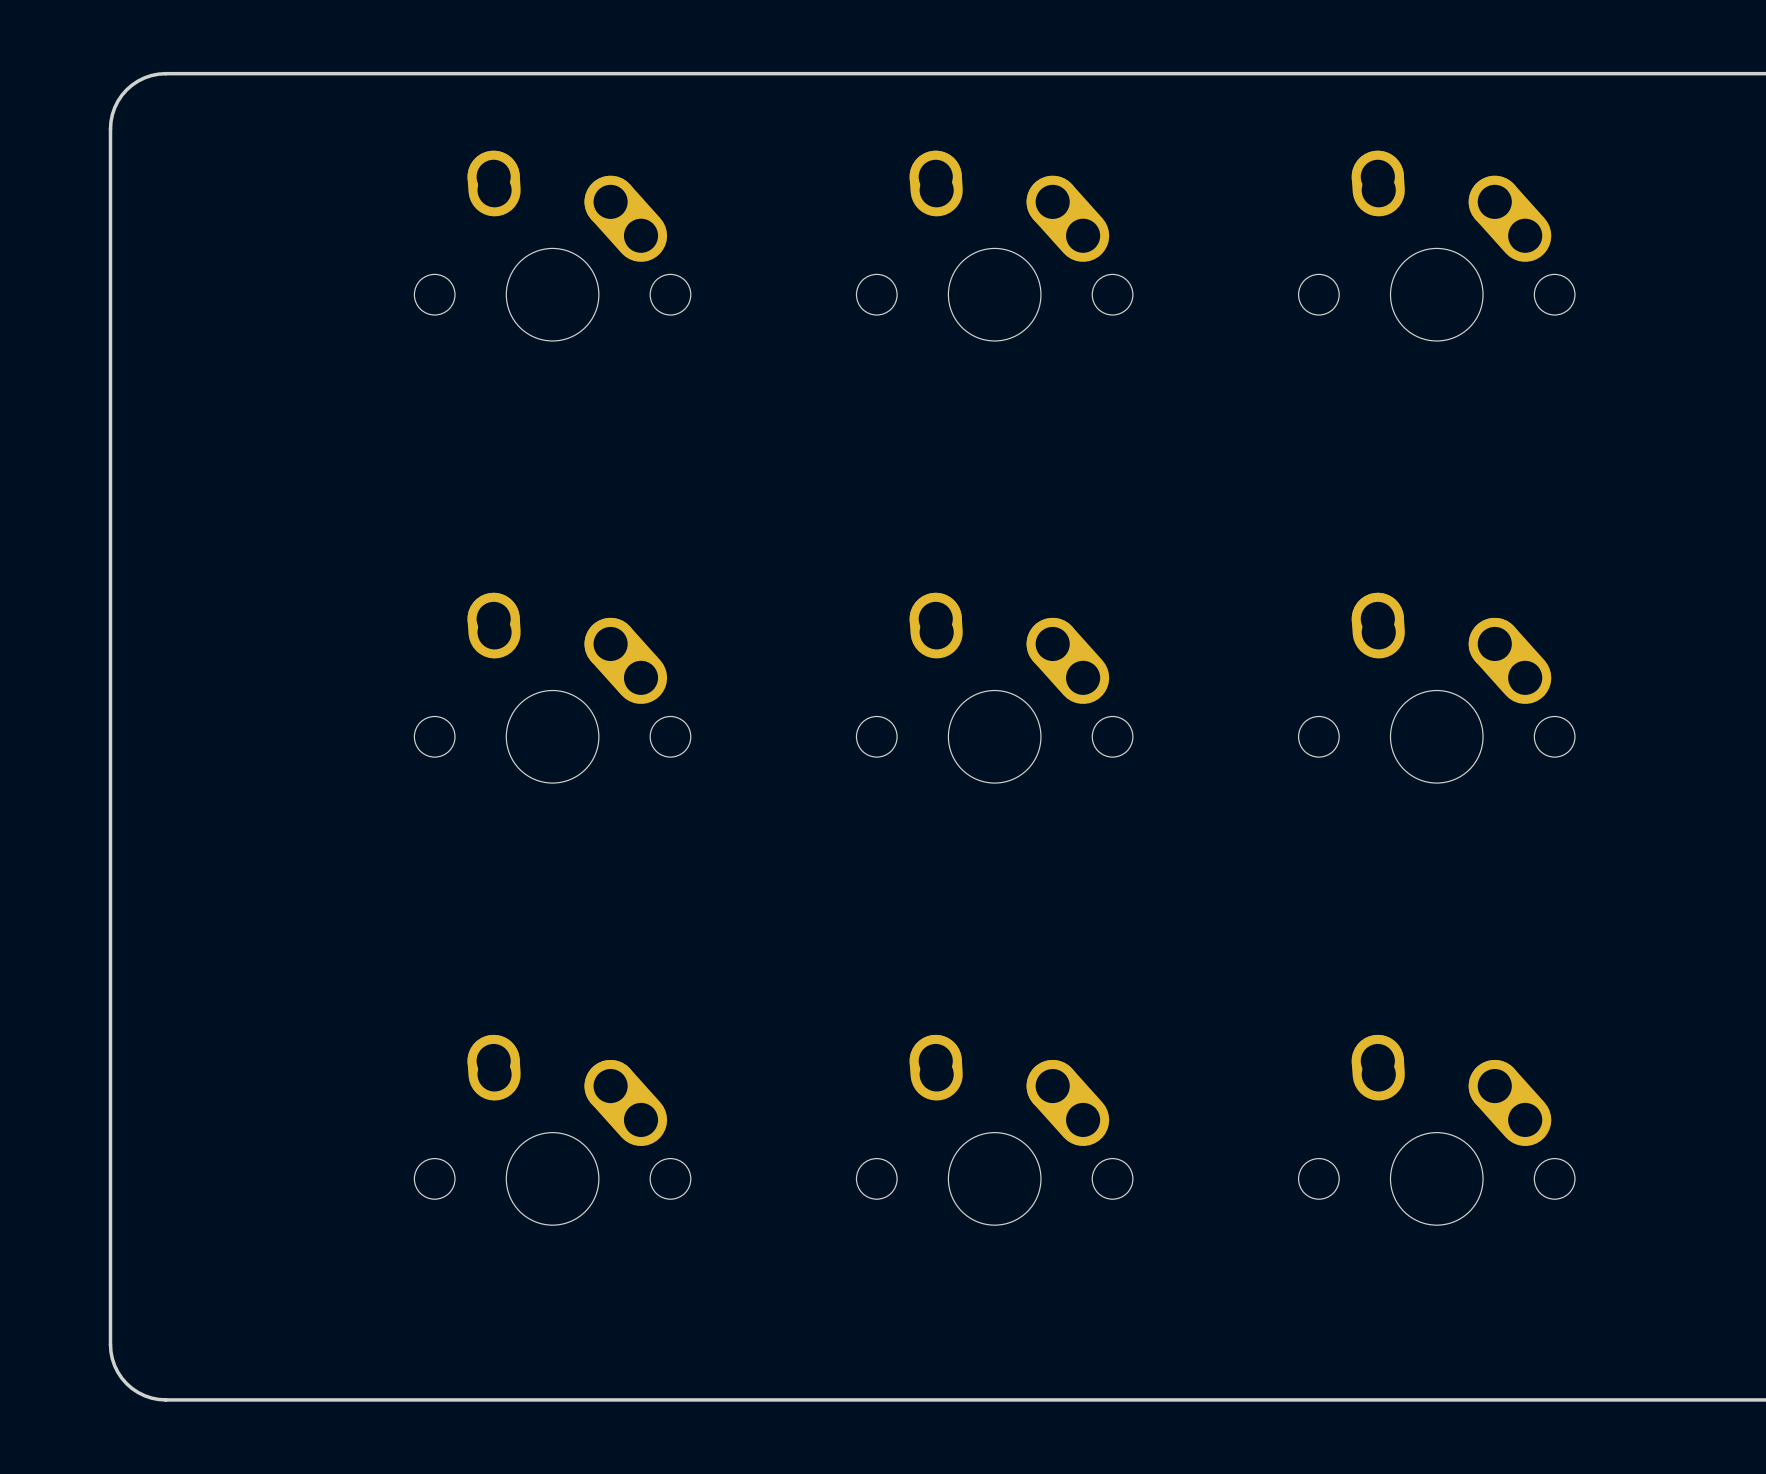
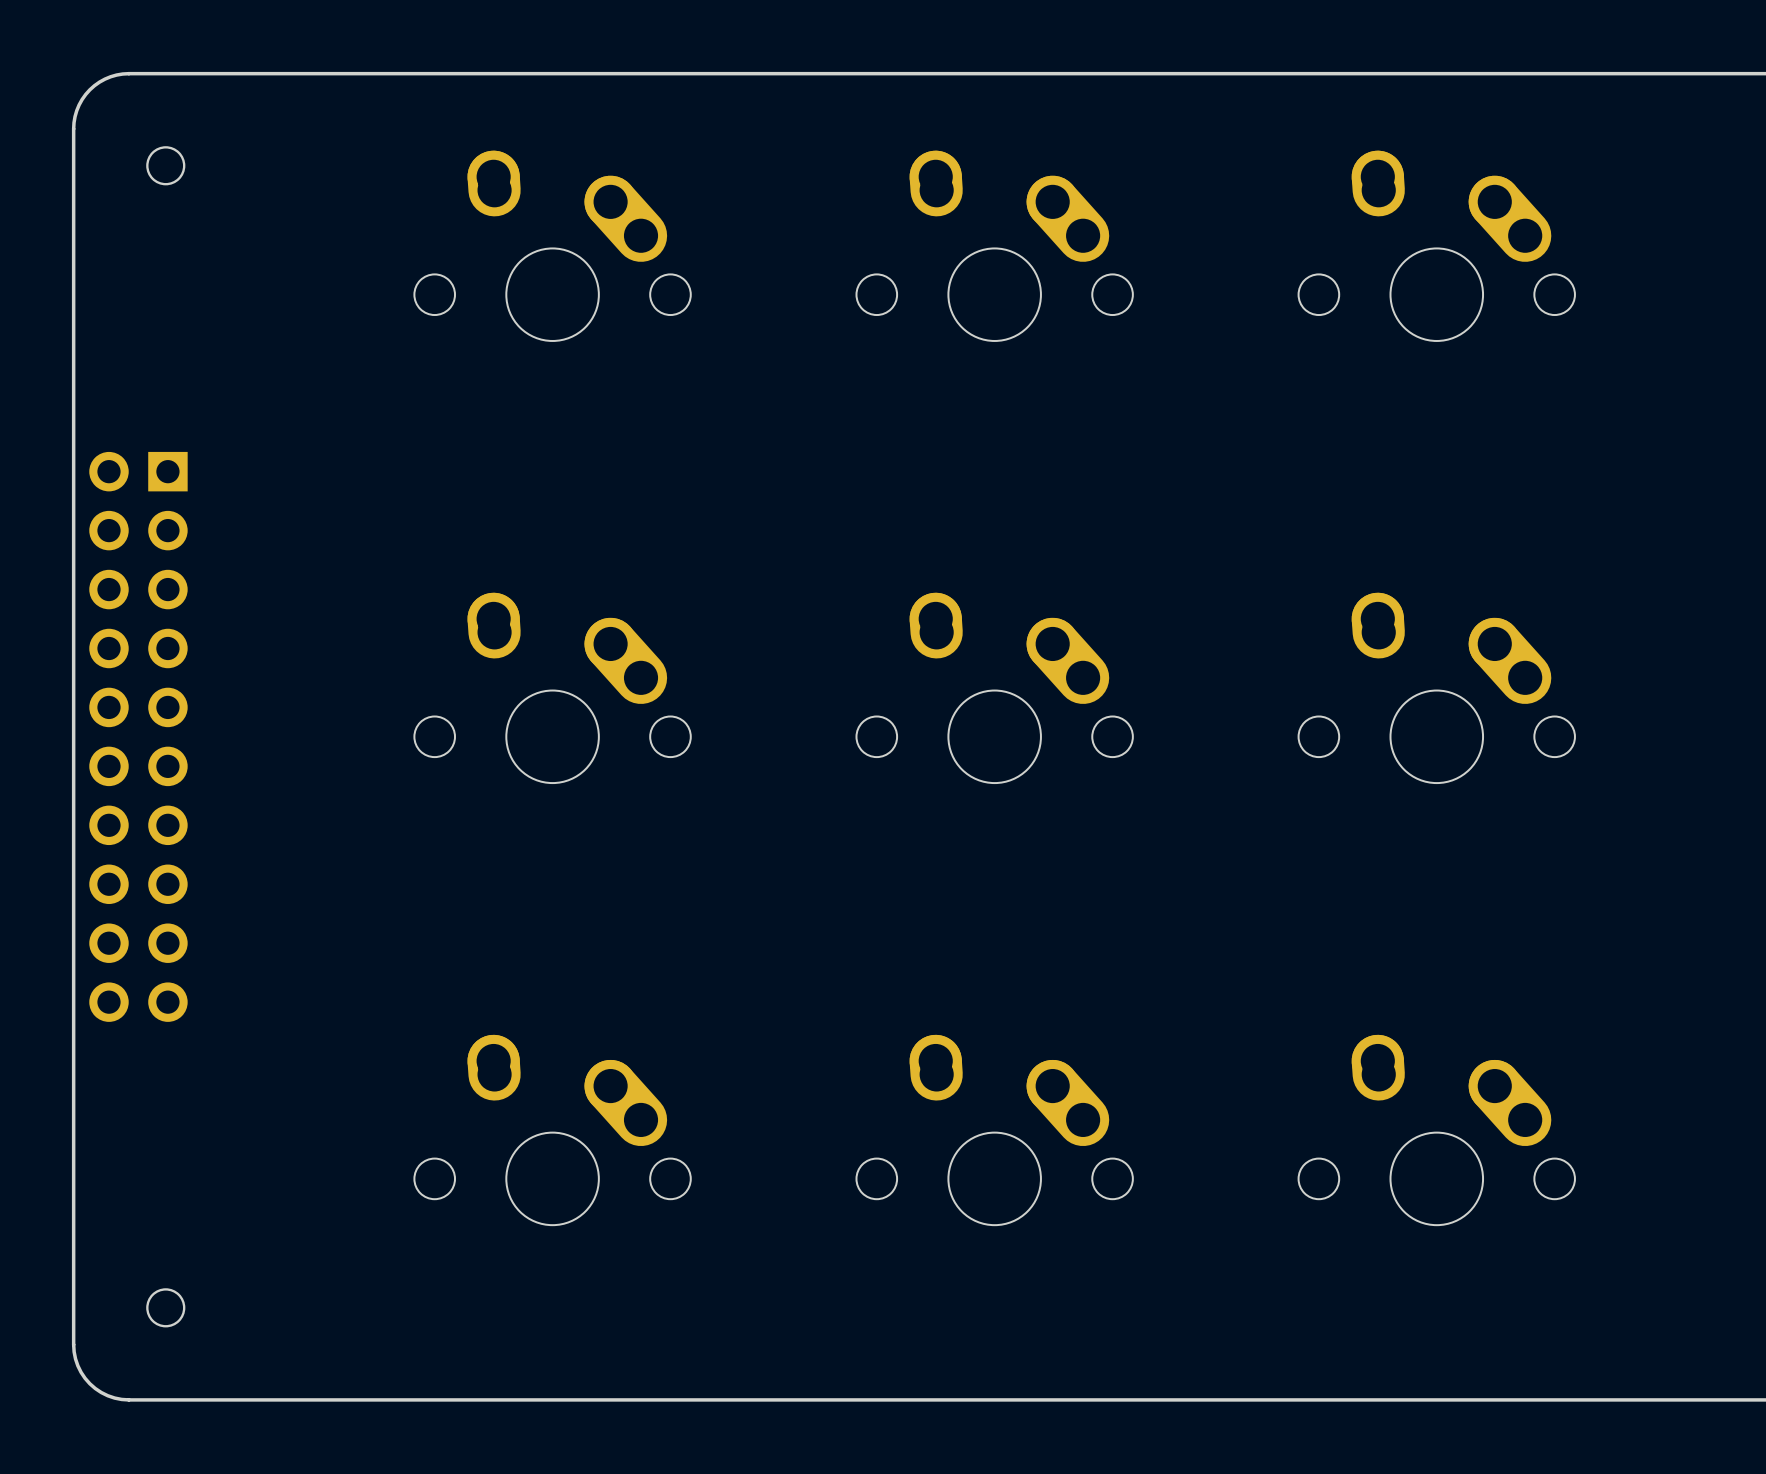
board edge: (165, 73) (144, 77) (126, 89) (114, 107) (110, 128) (110, 1344) (114, 1365) (126, 1383) (144, 1395) (165, 1399) -> (165, 73) (122, 74) (99, 82) (89, 89) (79, 104) (73, 128) (74, 1351) (81, 1372) (89, 1383) (101, 1392) (121, 1399) (165, 1399)
round board edge: none -> [146, 146, 186, 186]
part: none -> (138, 736)
round board edge: none -> [146, 1288, 186, 1328]

